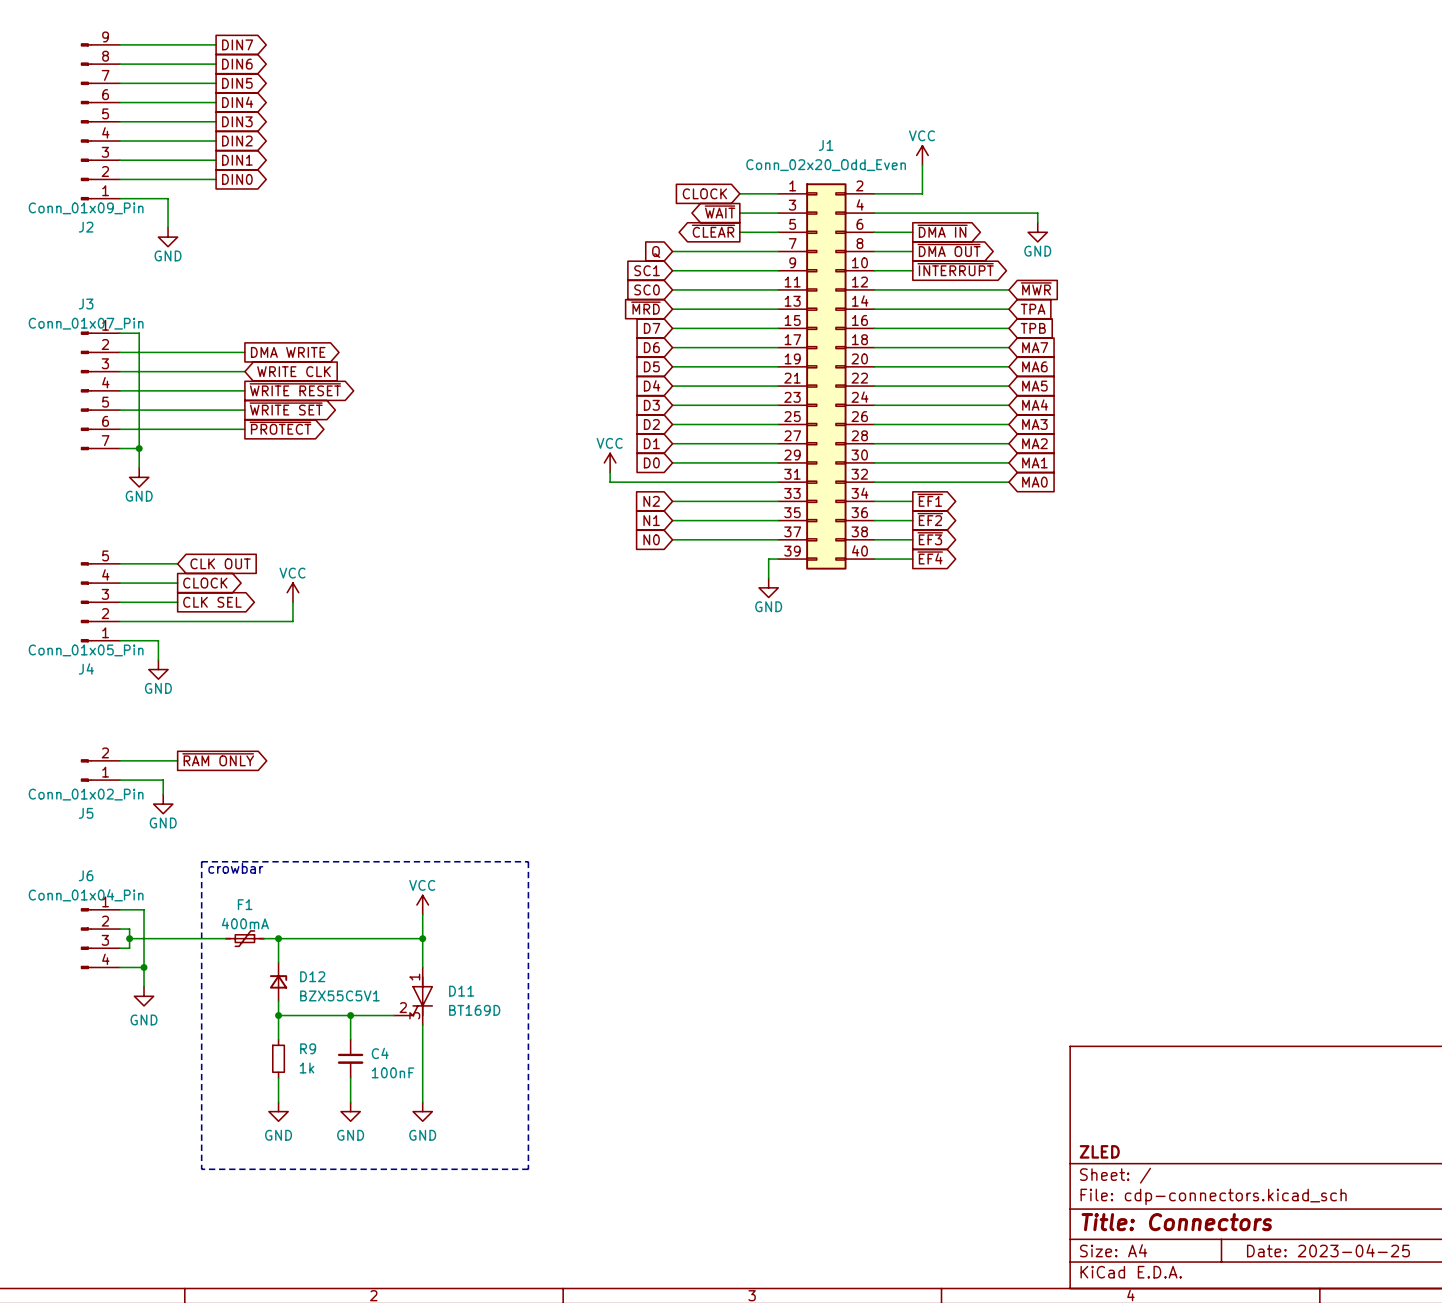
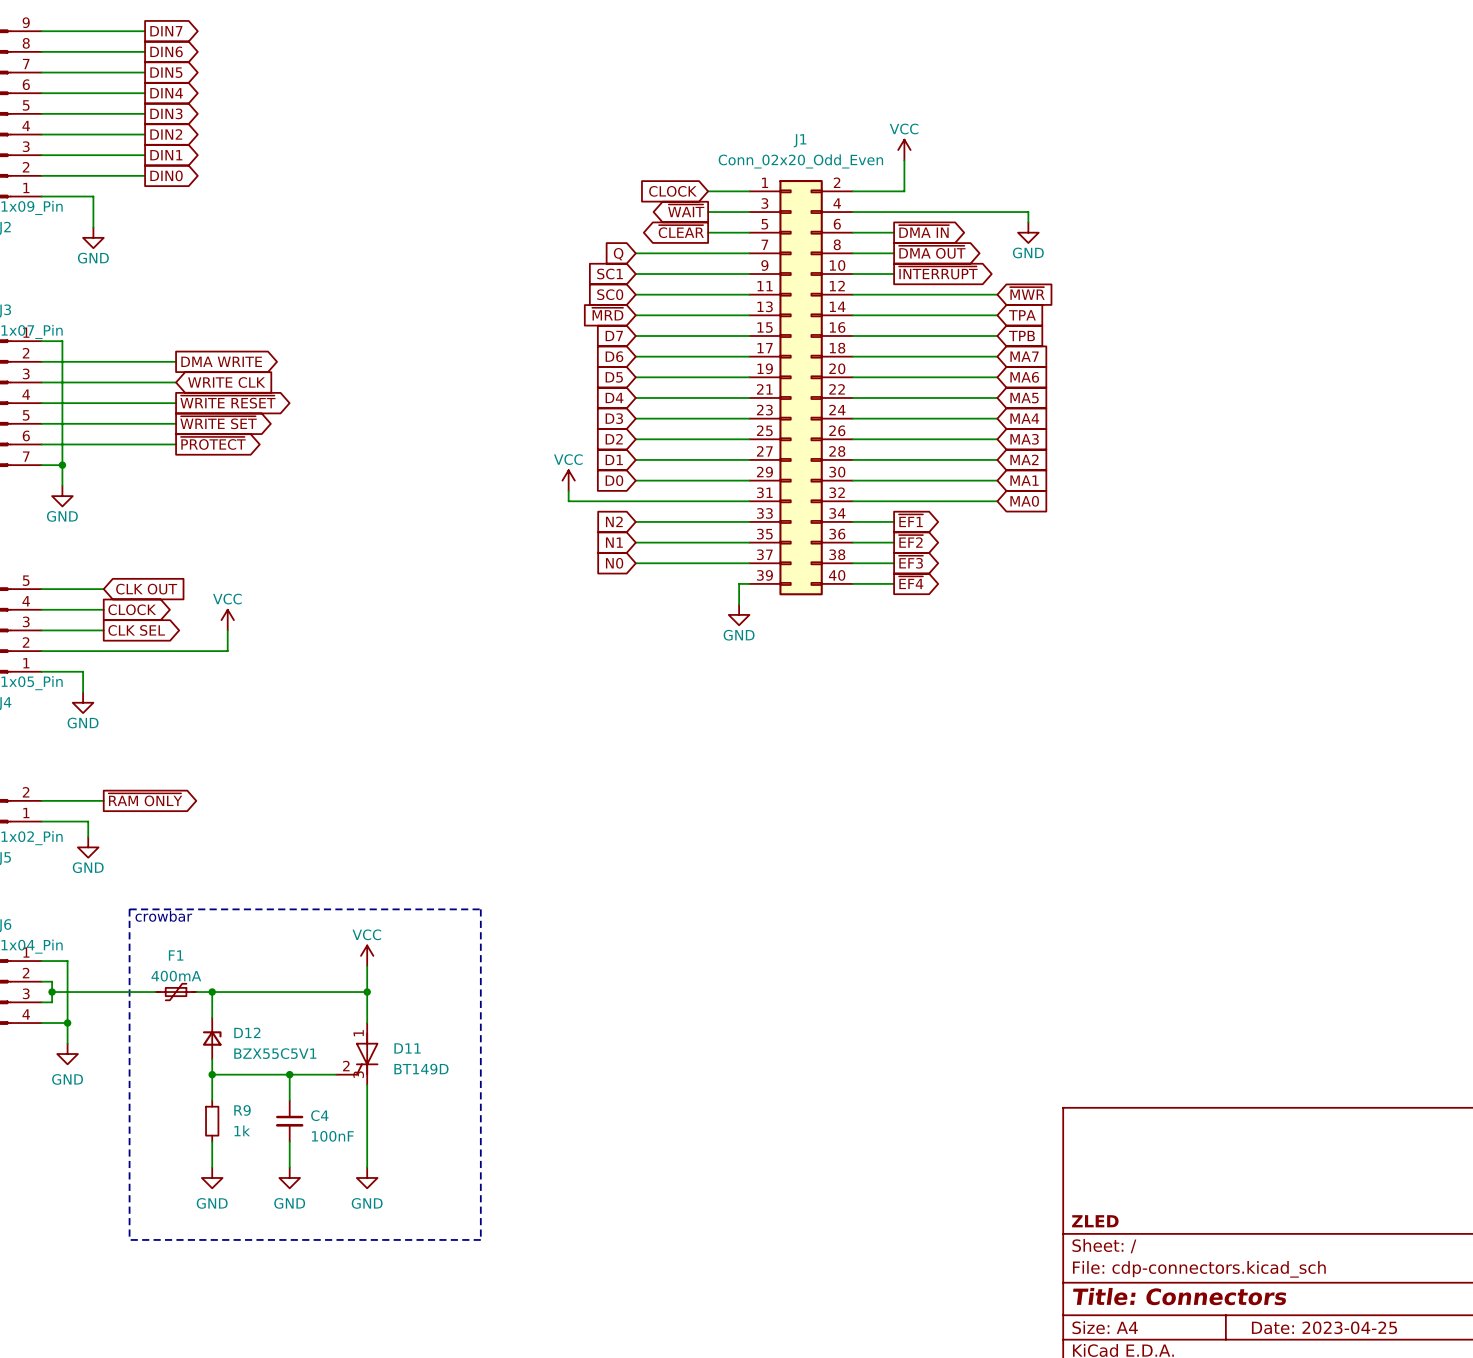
D11 value: BT169D (474, 1010) -> BT149D (421, 1069)

